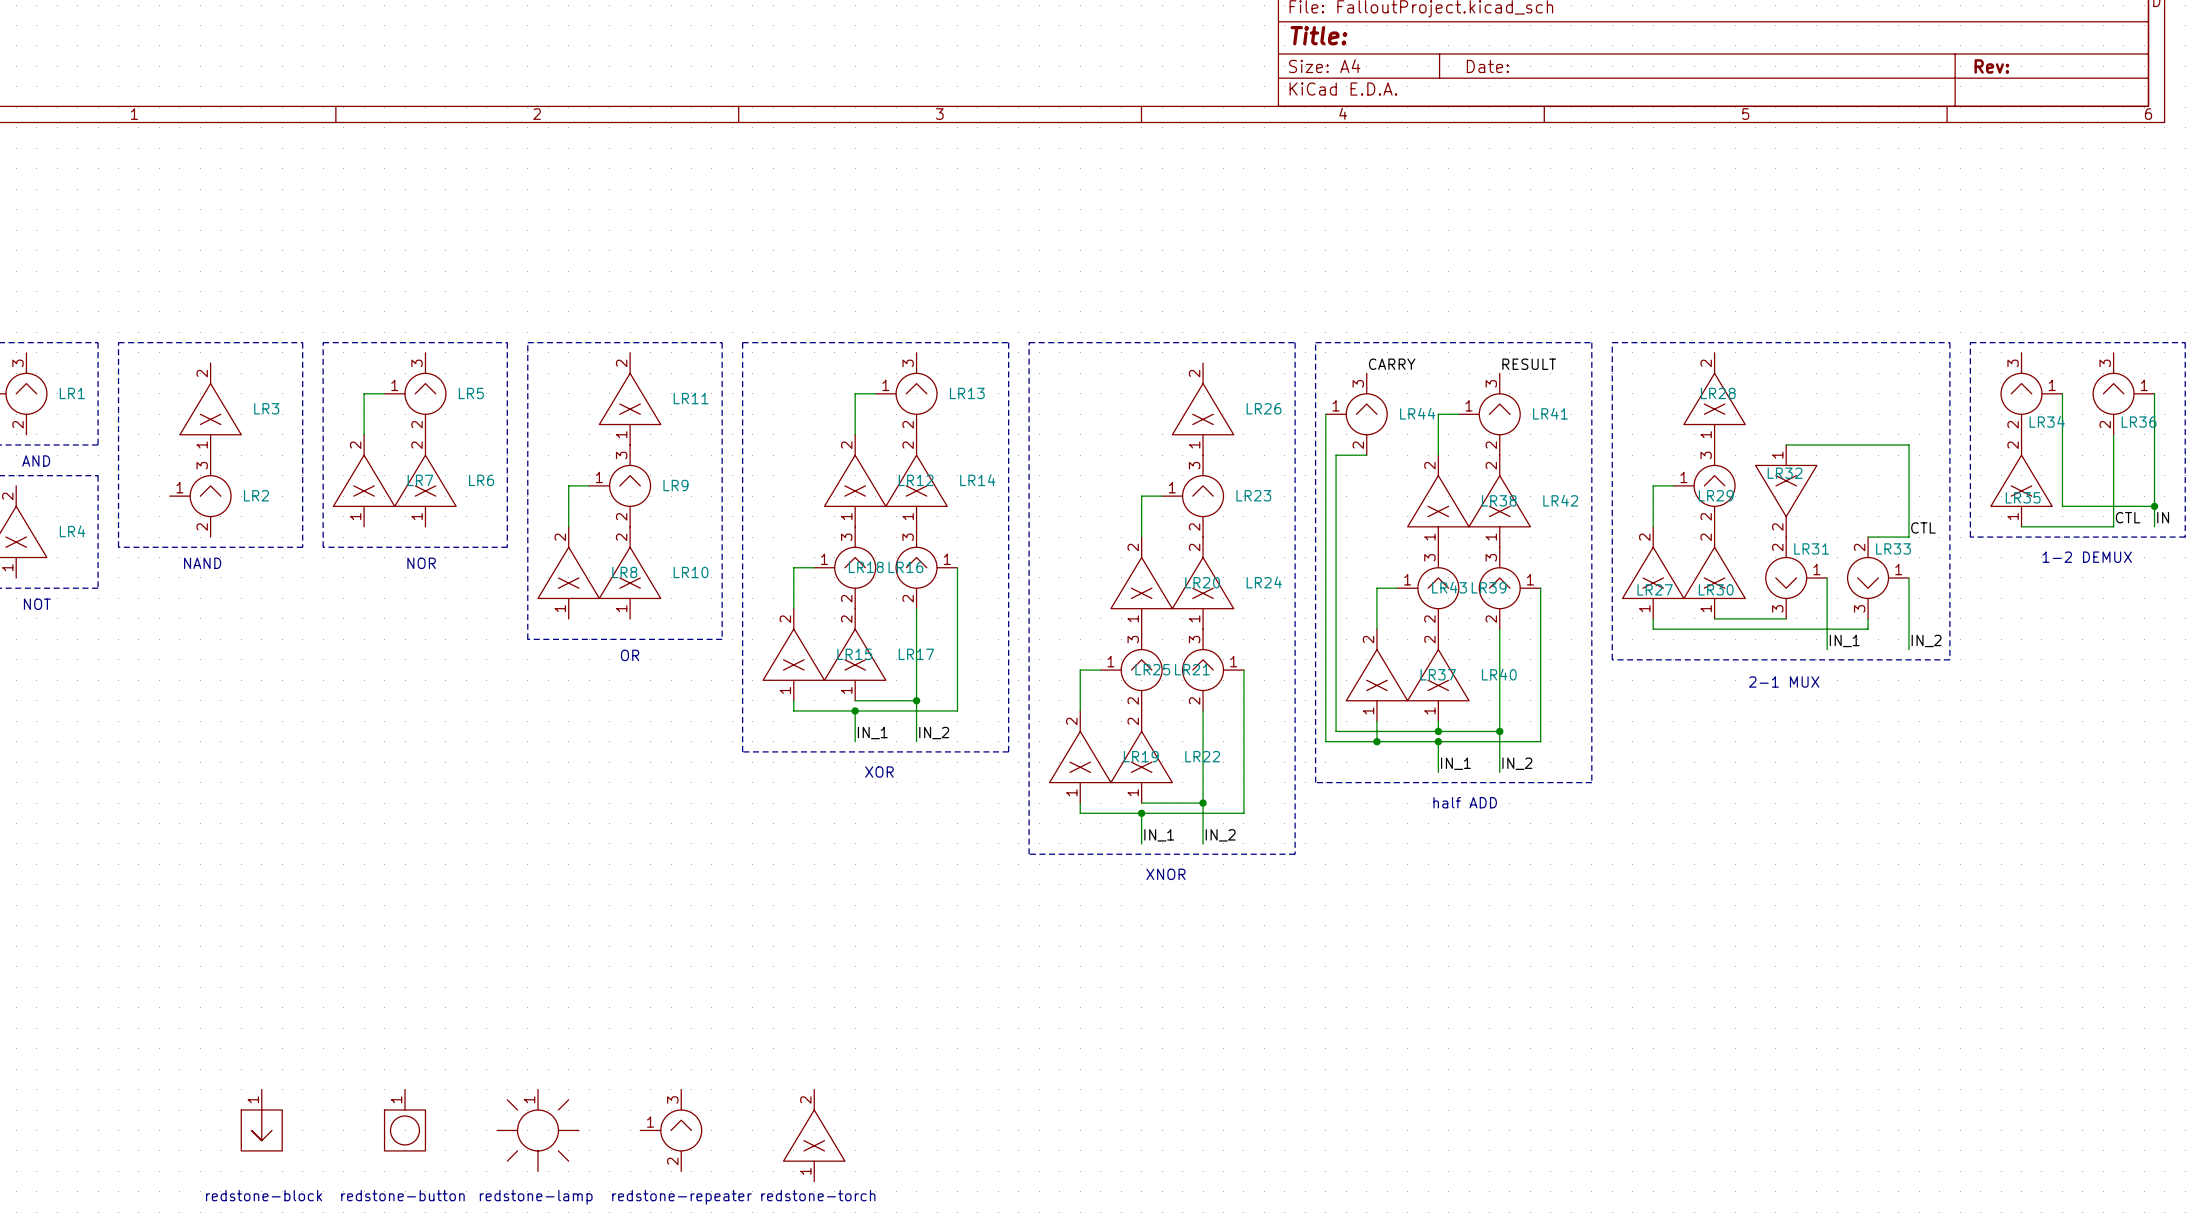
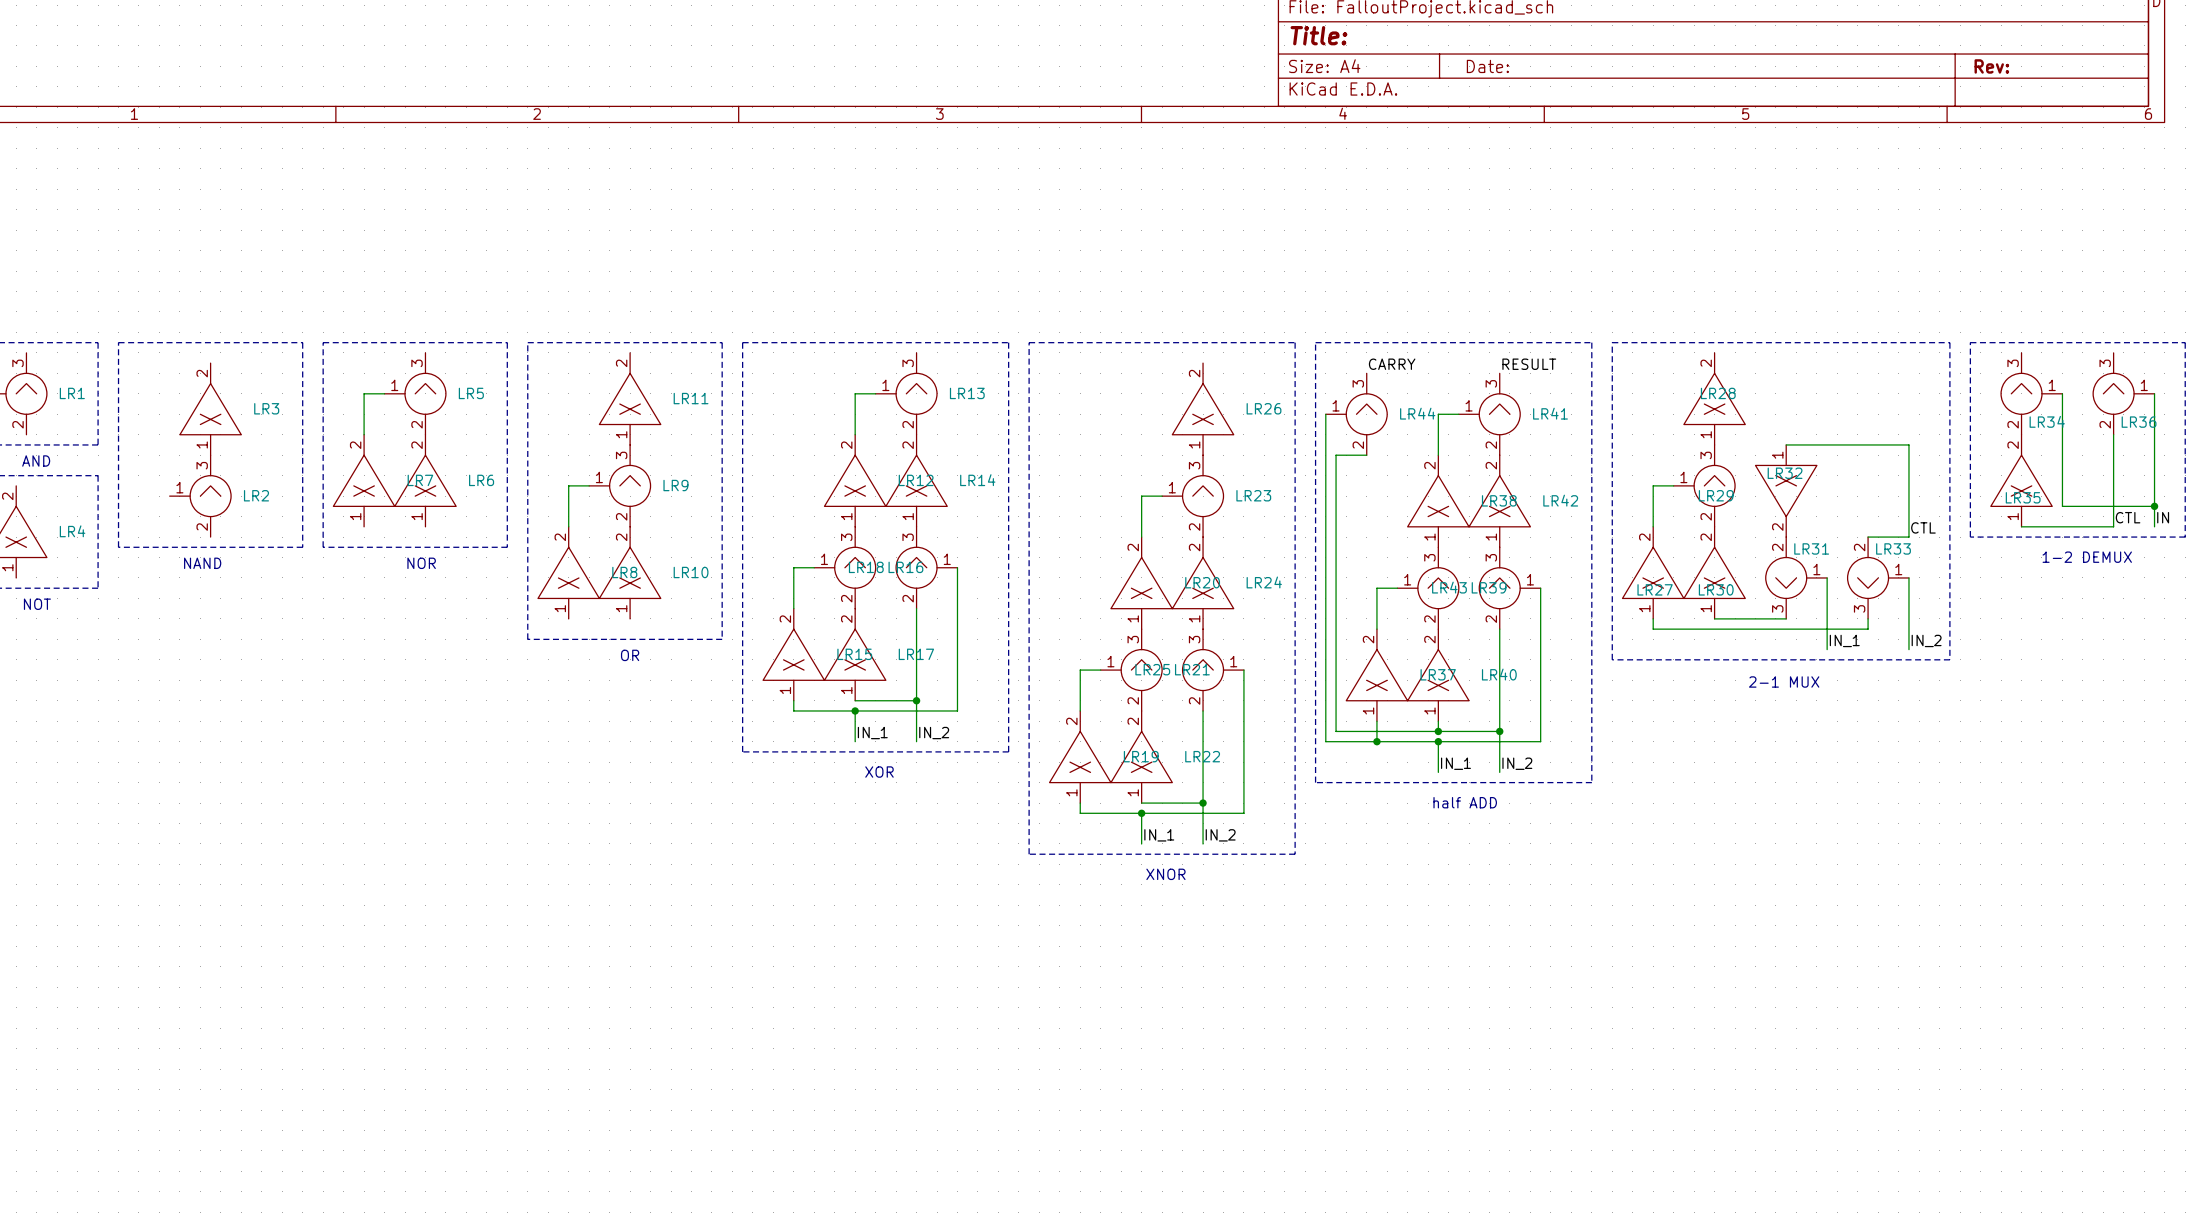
part: (261, 1120) -> none
part: (405, 1120) -> none
part: (538, 1130) -> none
part: (671, 1130) -> none
part: (814, 1135) -> none
text: redstone-block (264, 1195) -> none
text: redstone-button (402, 1195) -> none
text: redstone-torch (818, 1195) -> none
text: redstone-lamp (536, 1197) -> none
text: redstone-repeater (681, 1197) -> none

